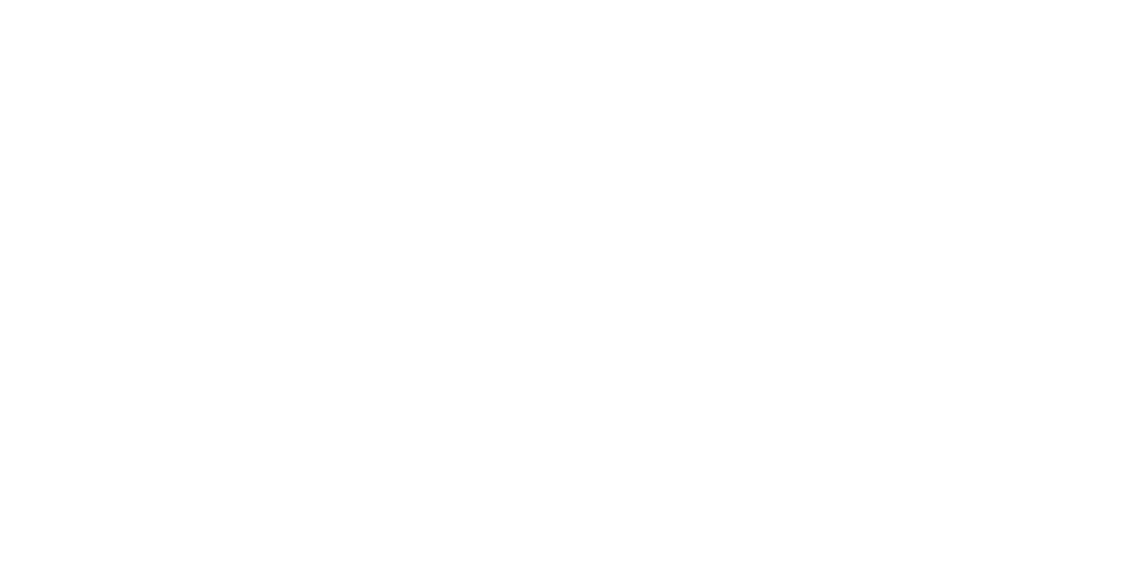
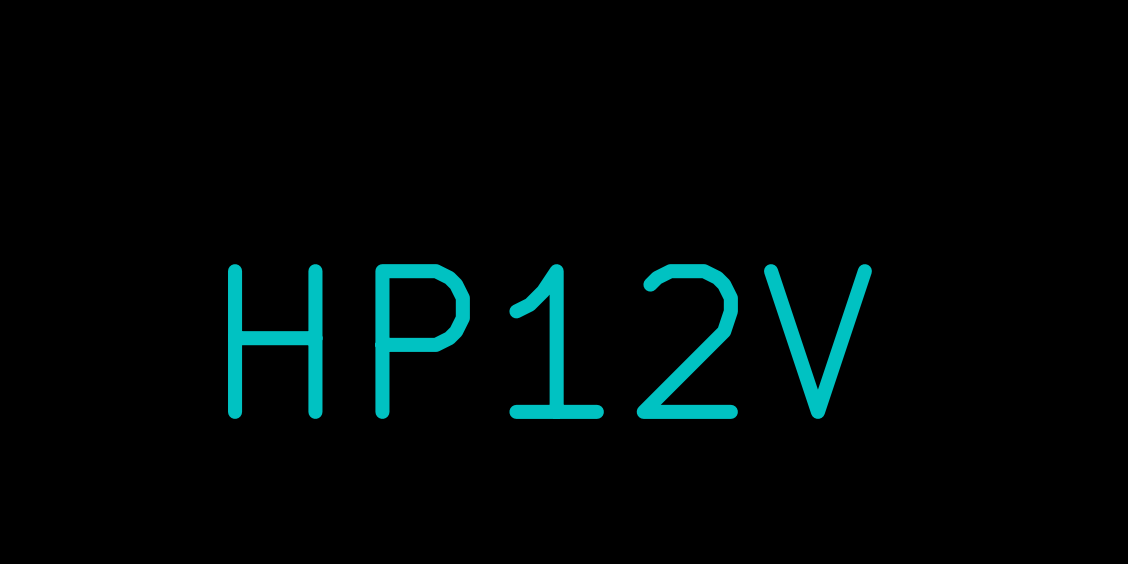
text: none -> HP12V (549, 341)

